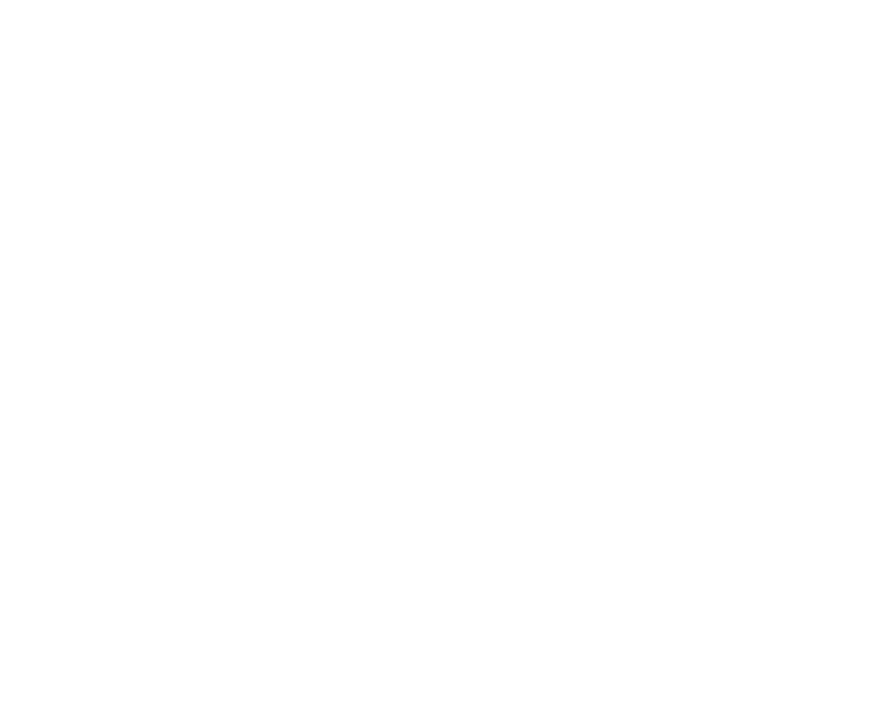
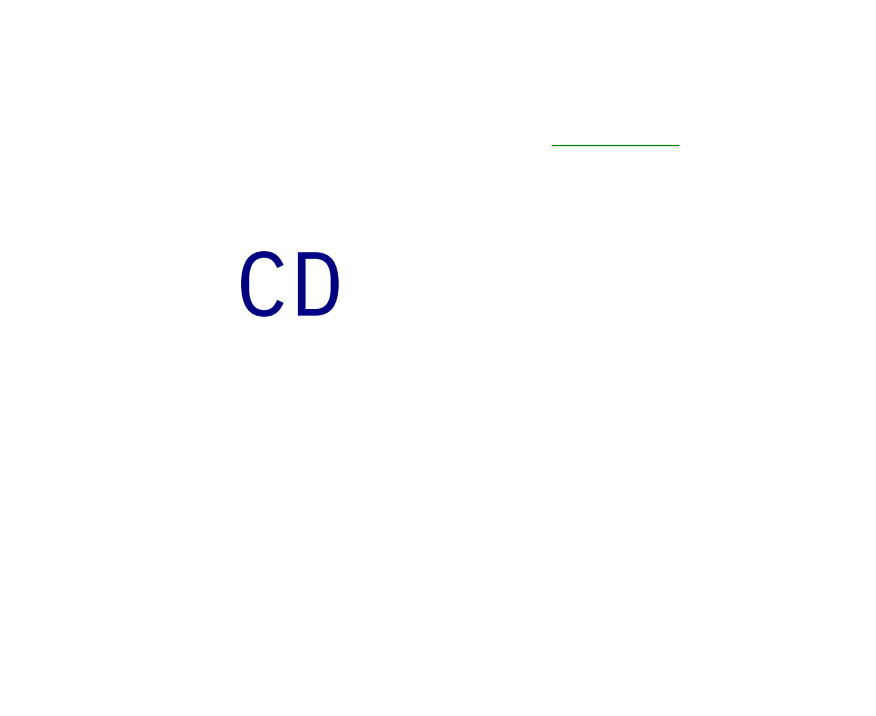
wire: none -> (552, 145) (678, 145)
text: none -> CD (289, 283)

